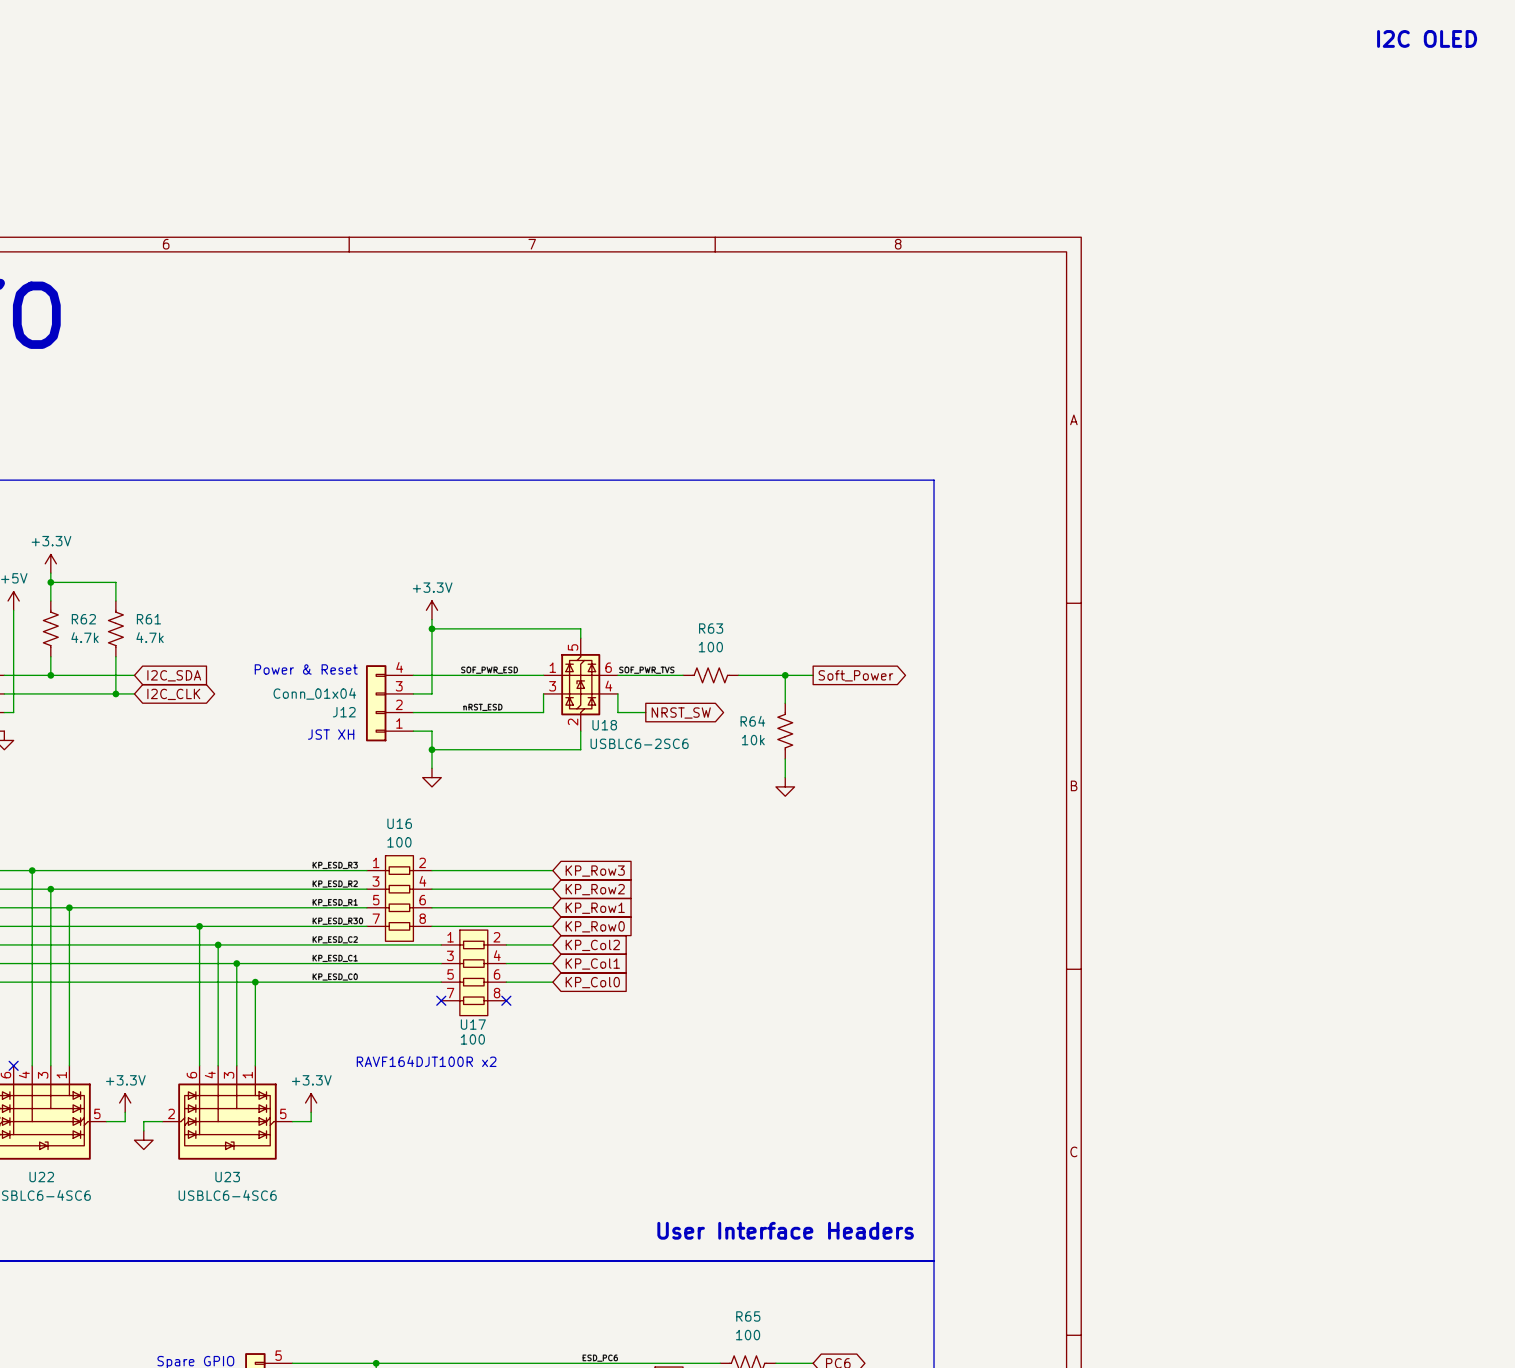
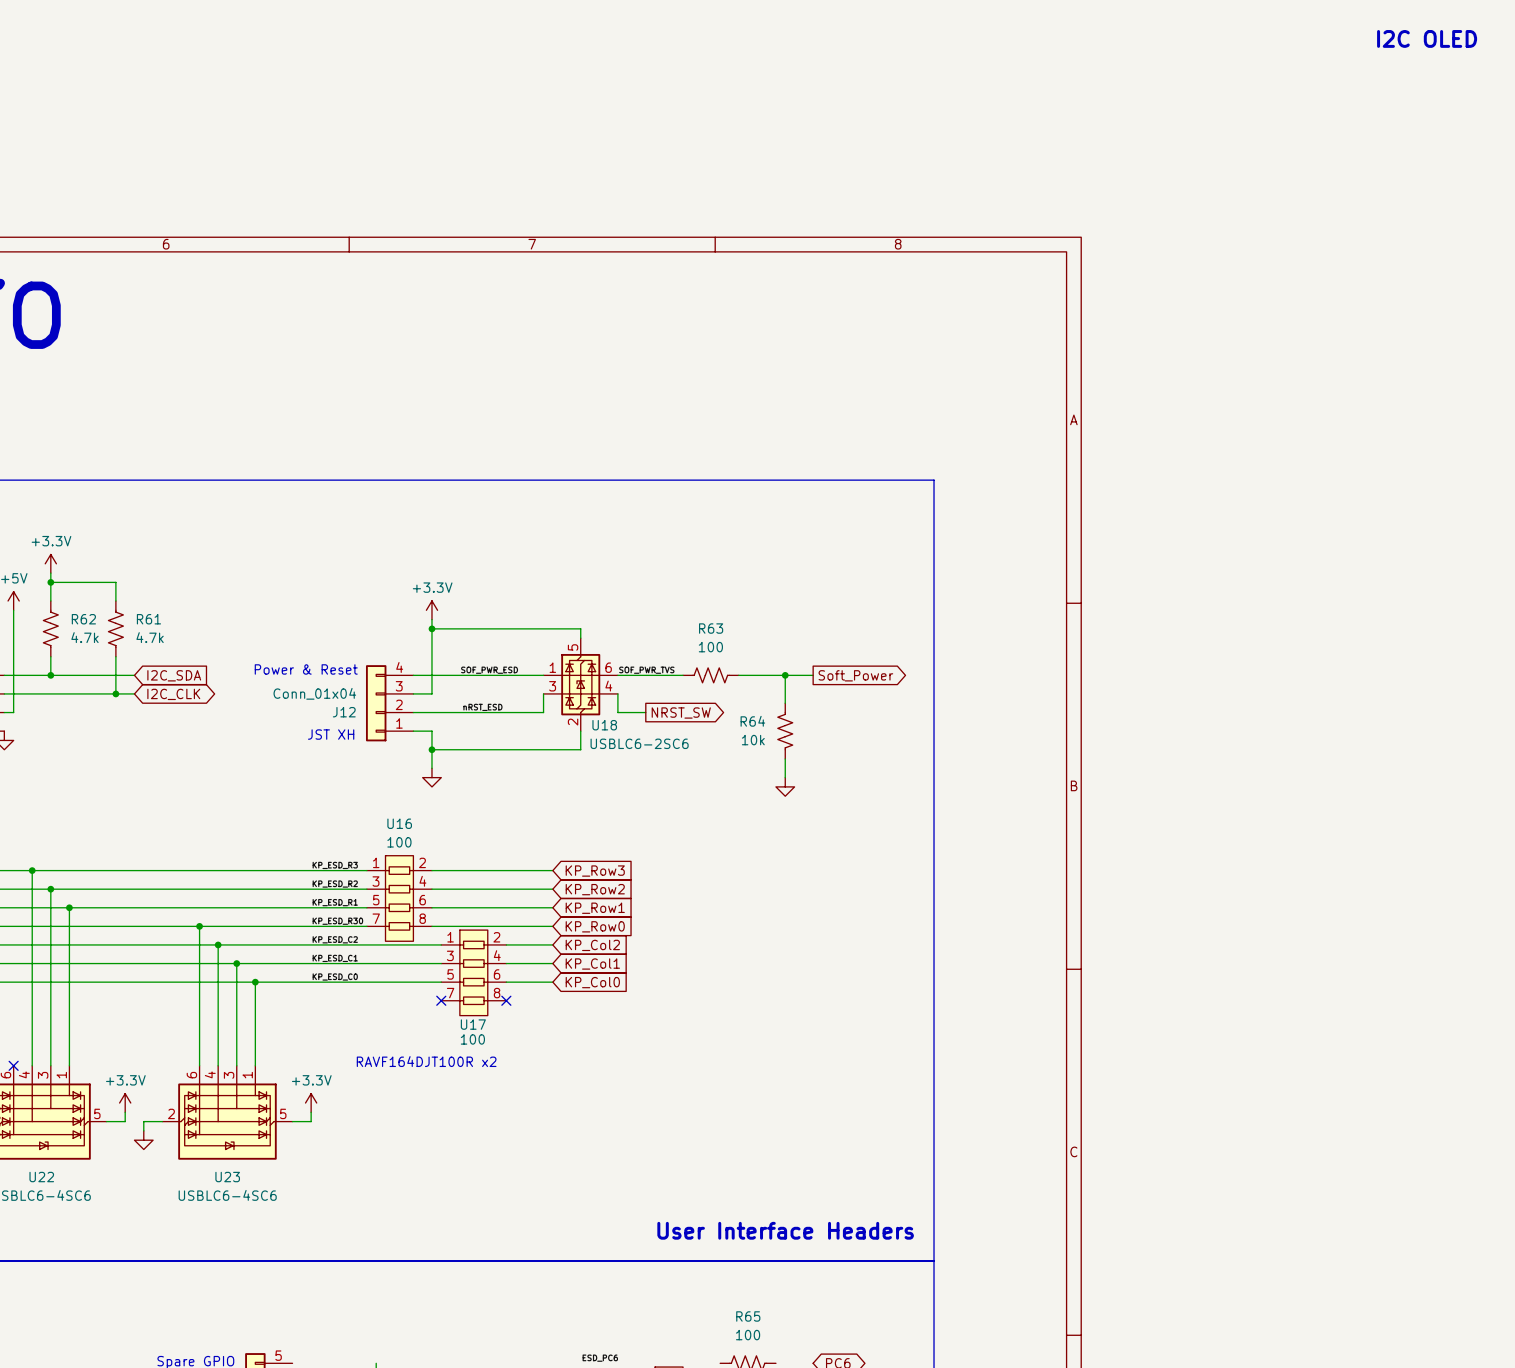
wire: (292, 1363) (720, 1363) -> none
junction: (376, 1363) -> none
wire: (775, 1363) (813, 1363) -> none

